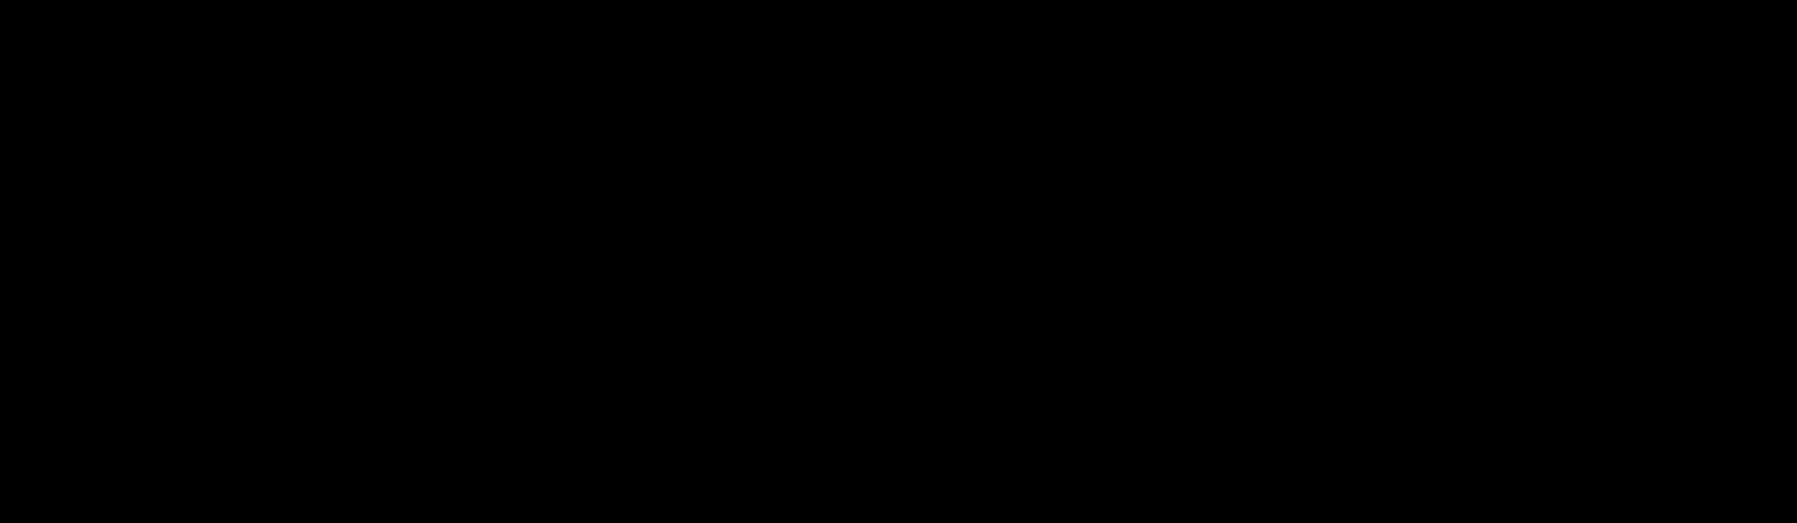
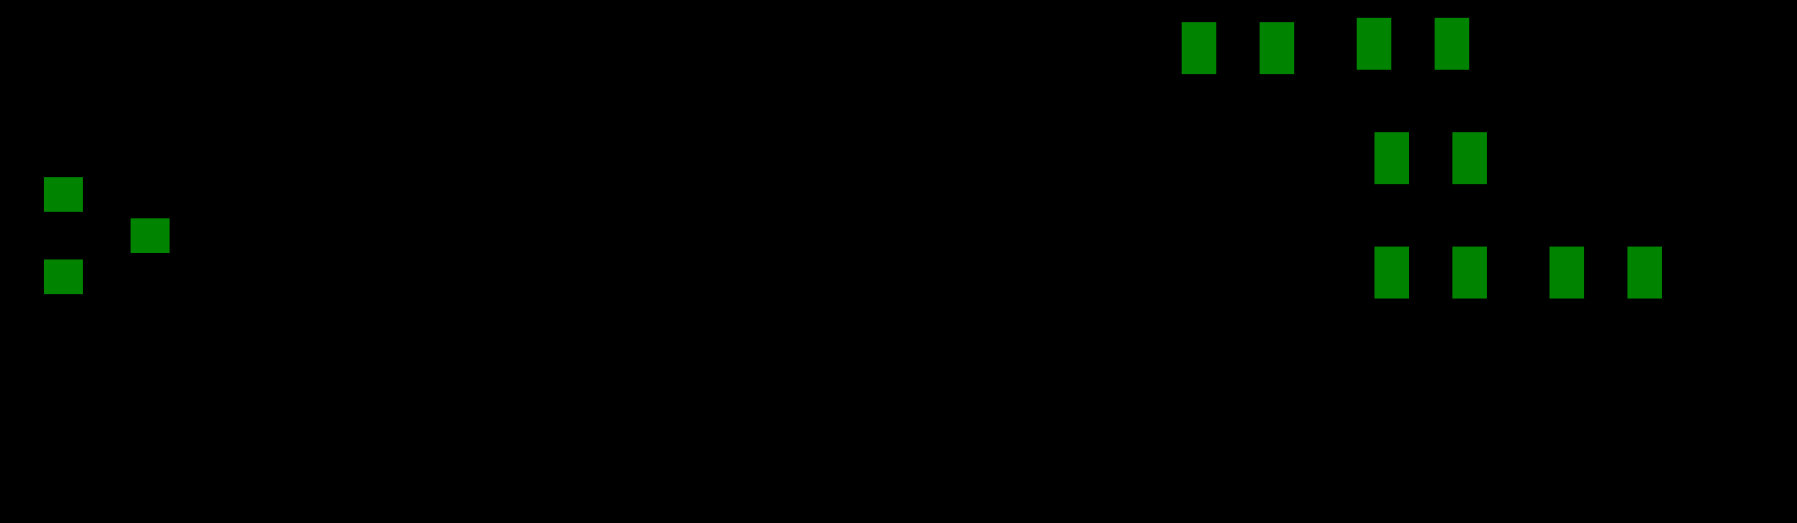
part: none -> (1412, 43)
part: none -> (1237, 48)
part: none -> (1430, 158)
part: none -> (106, 235)
part: none -> (1430, 272)
part: none -> (1605, 272)

